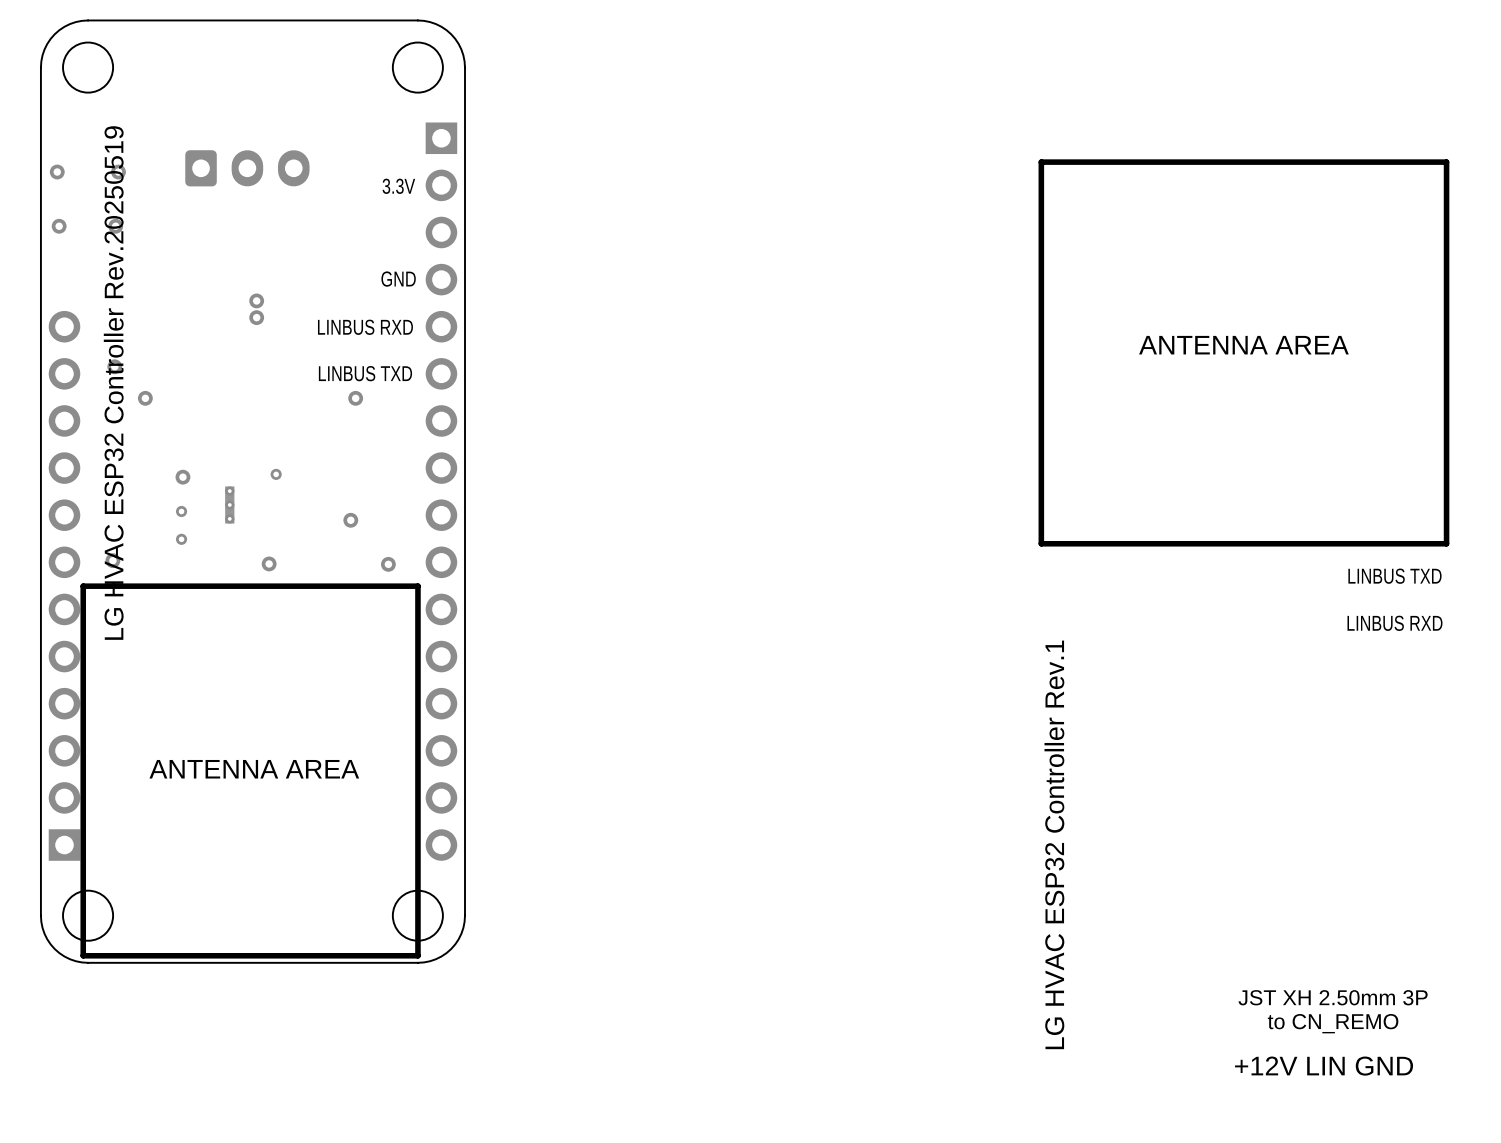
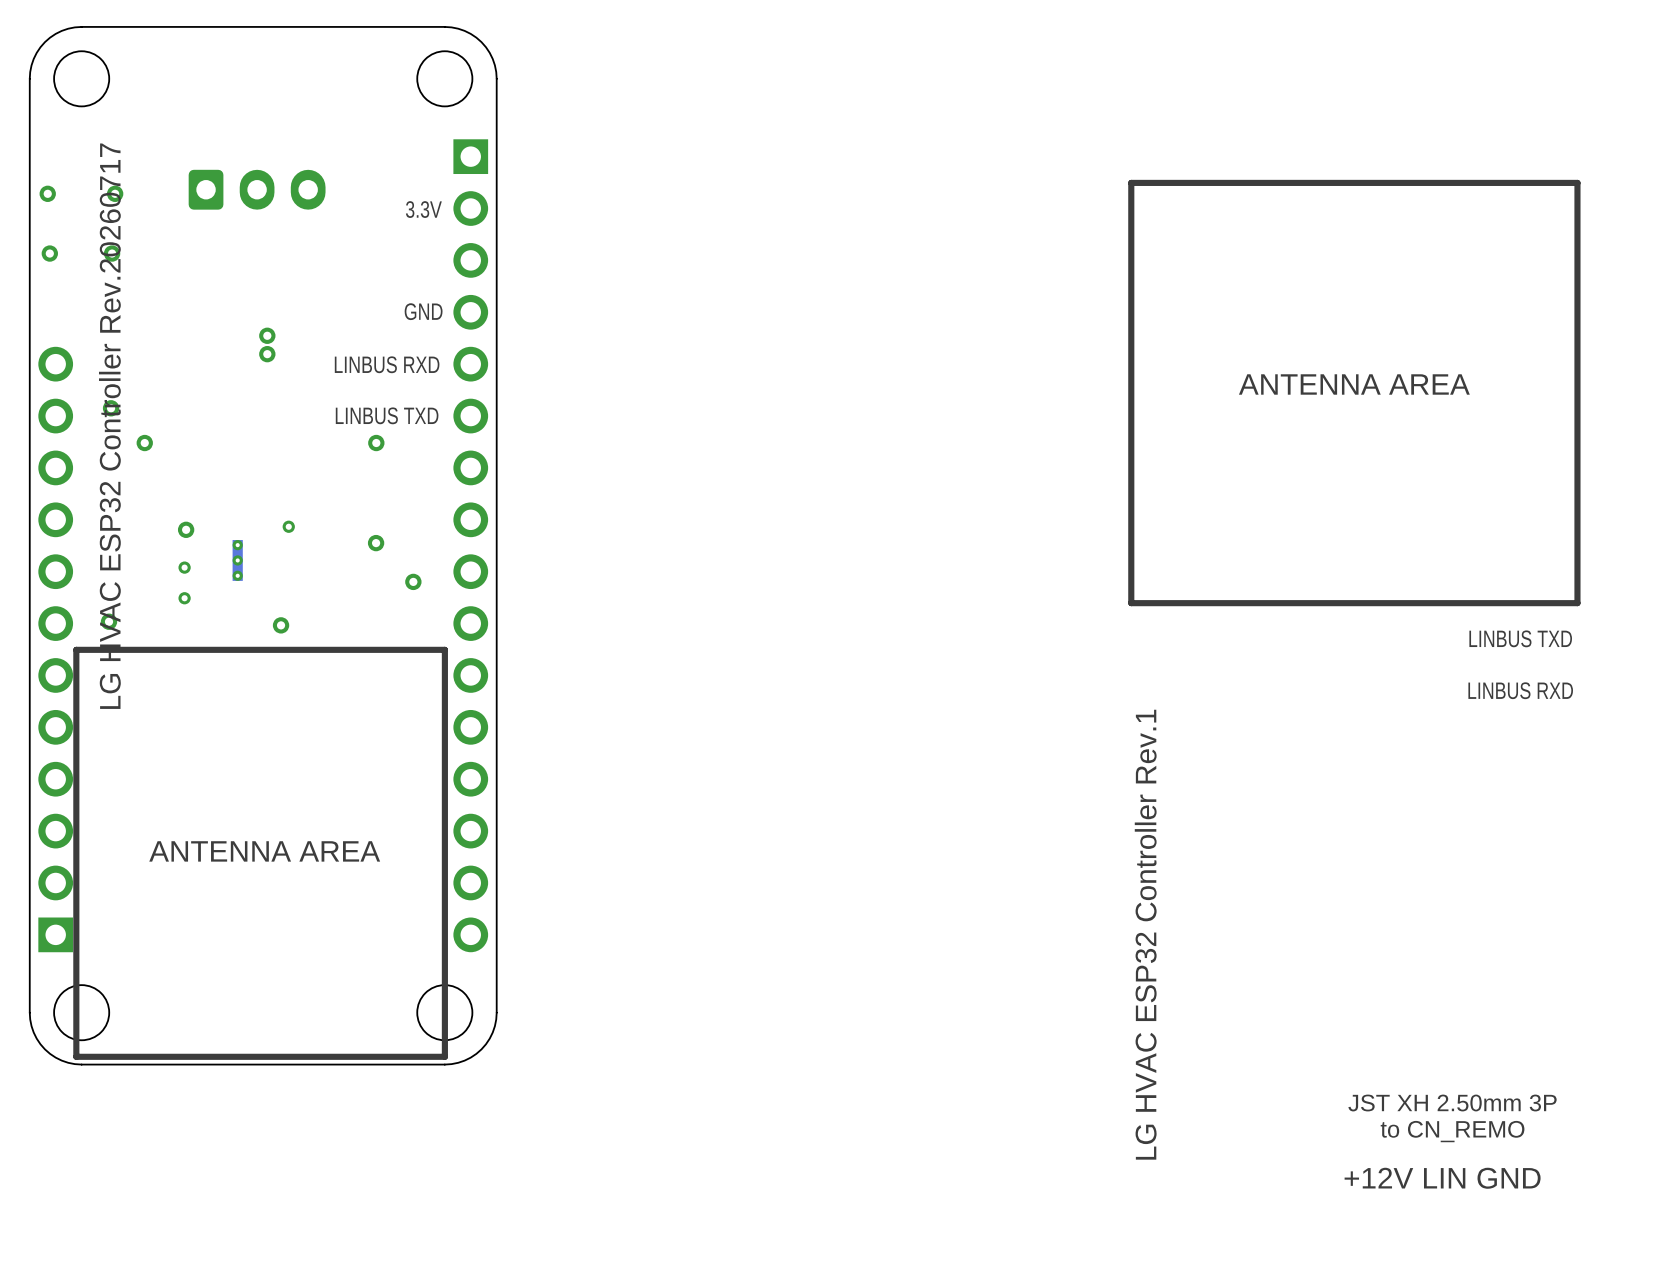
text: LG HVAC ESP32 Controller Rev.20250519 (113, 383) -> LG HVAC ESP32 Controller Rev.20260717 (109, 426)
via: none -> (376, 543)
via: (350, 520) -> none
via: none -> (413, 581)
via: (388, 564) -> none

